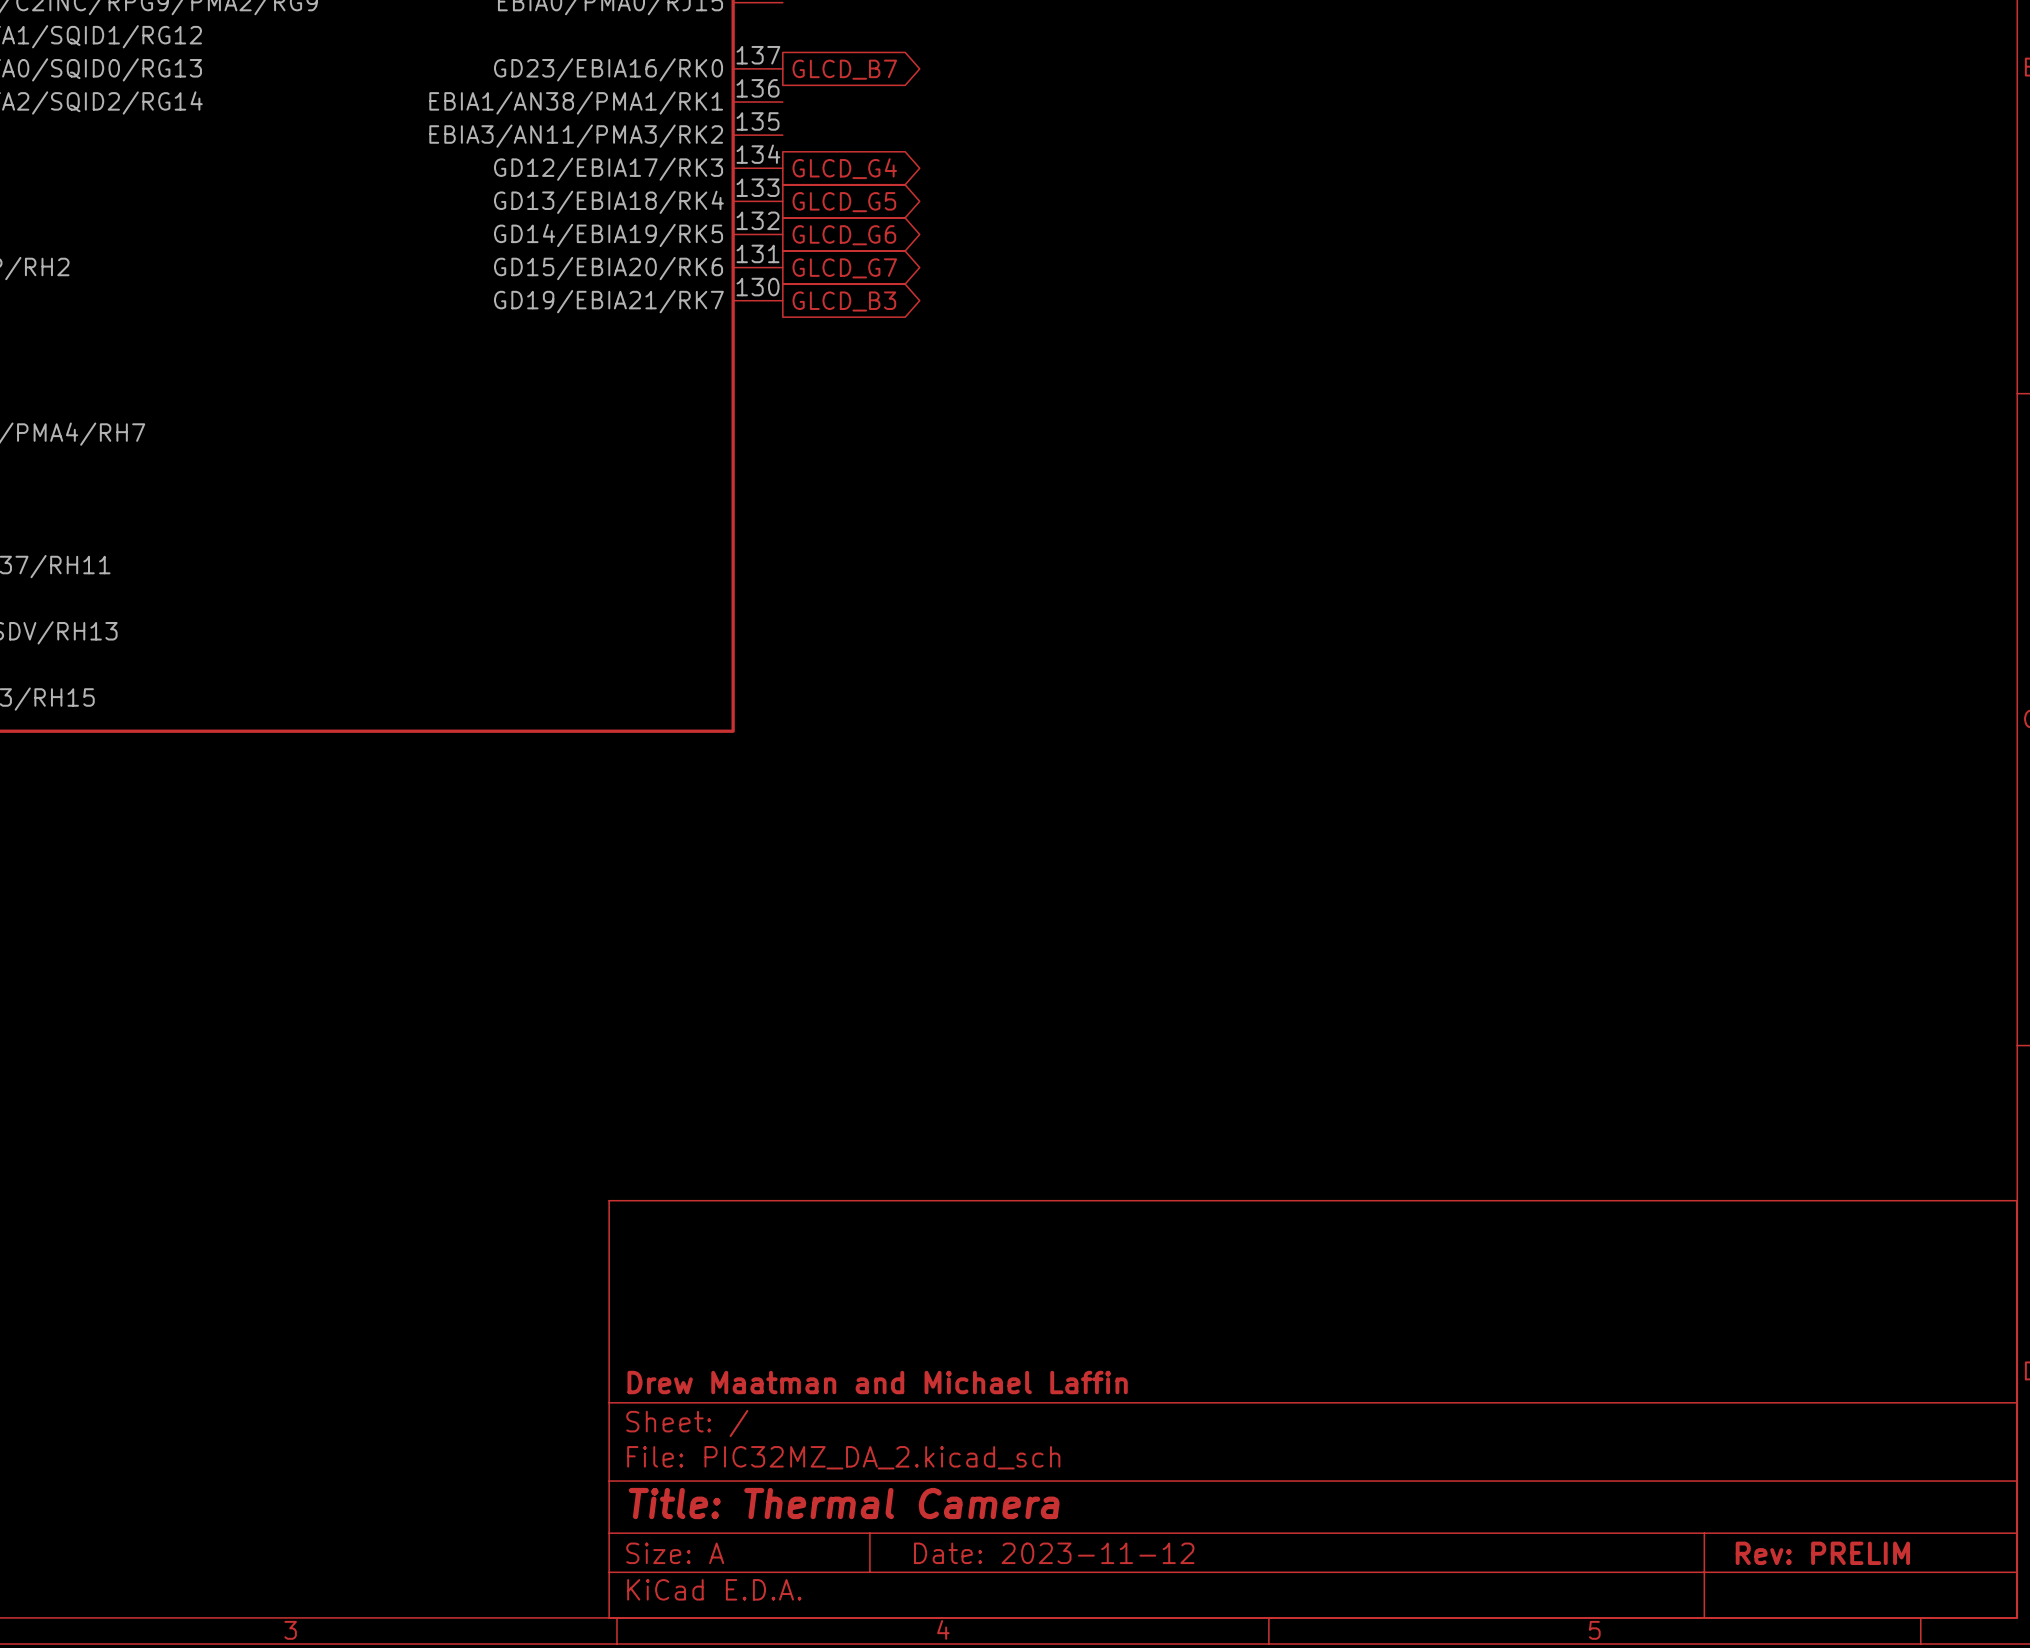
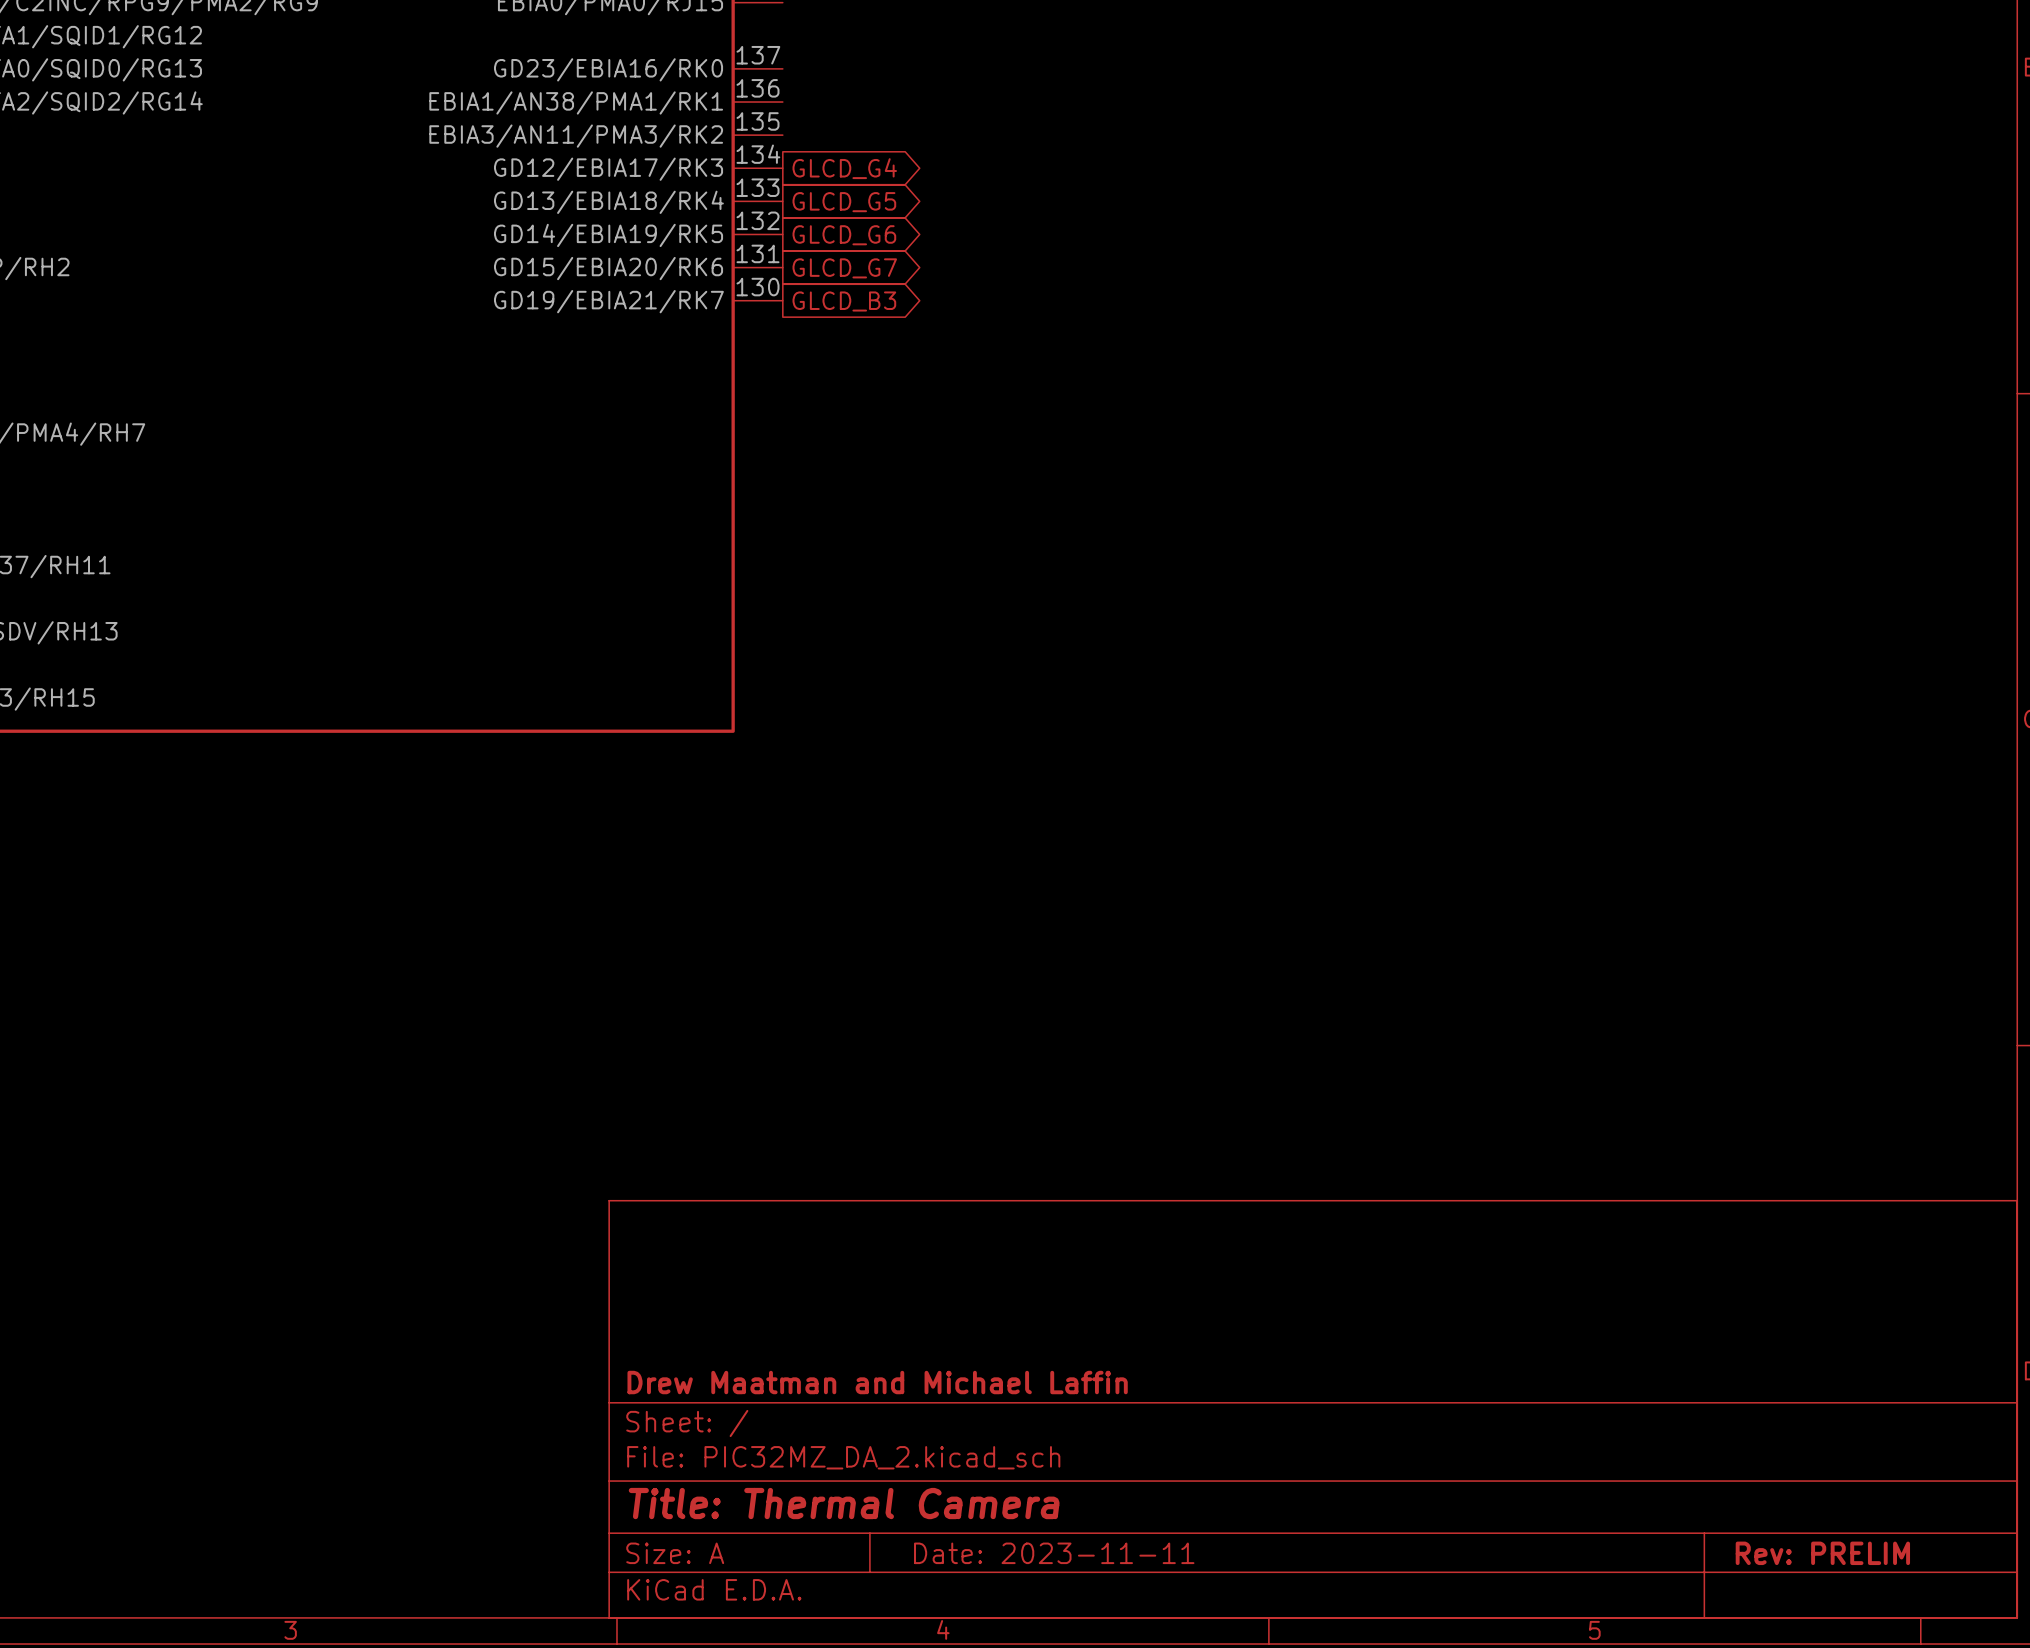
global label: GLCD_B7 (844, 69) -> none
title block: Date: 2023-11-12 (1054, 1553) -> Date: 2023-11-11 (1054, 1553)

